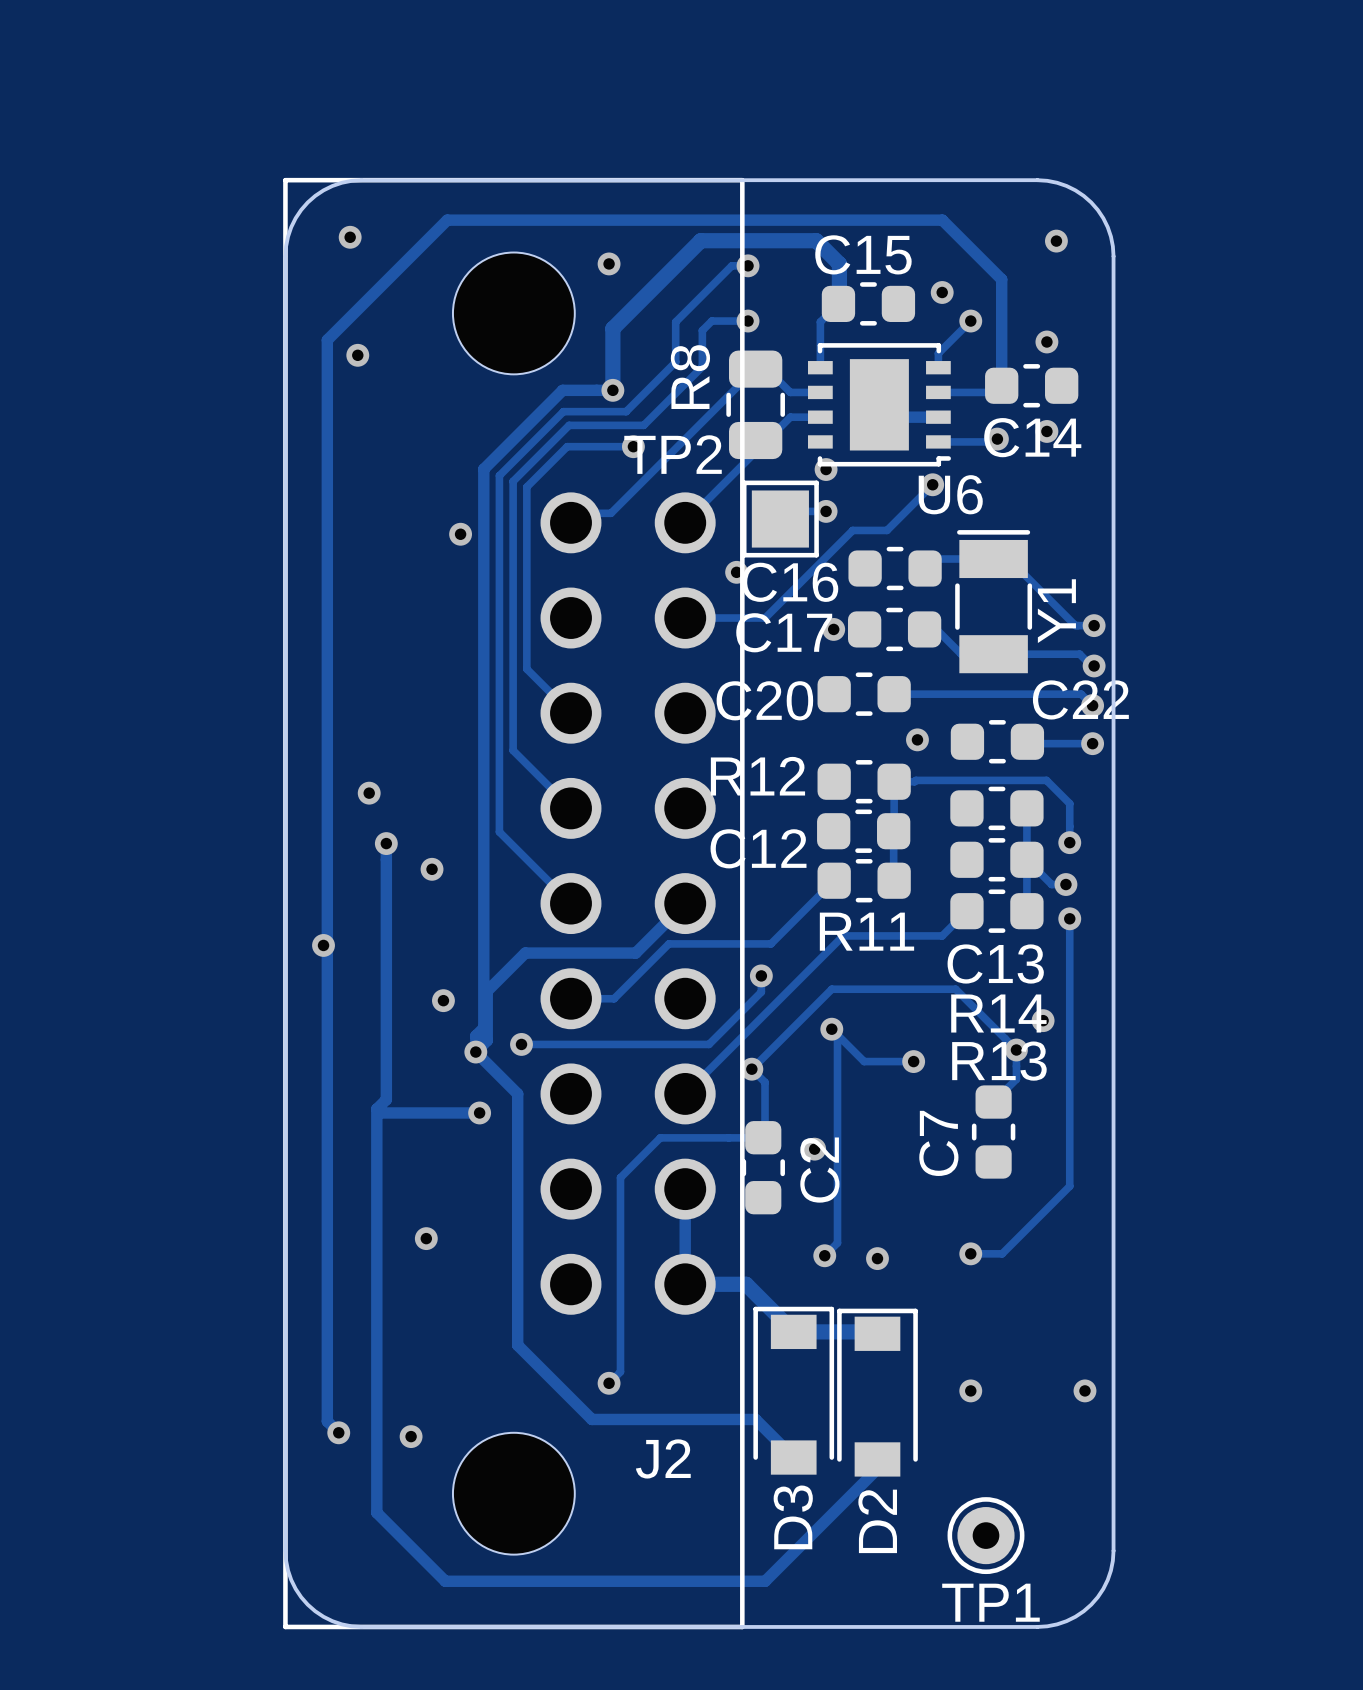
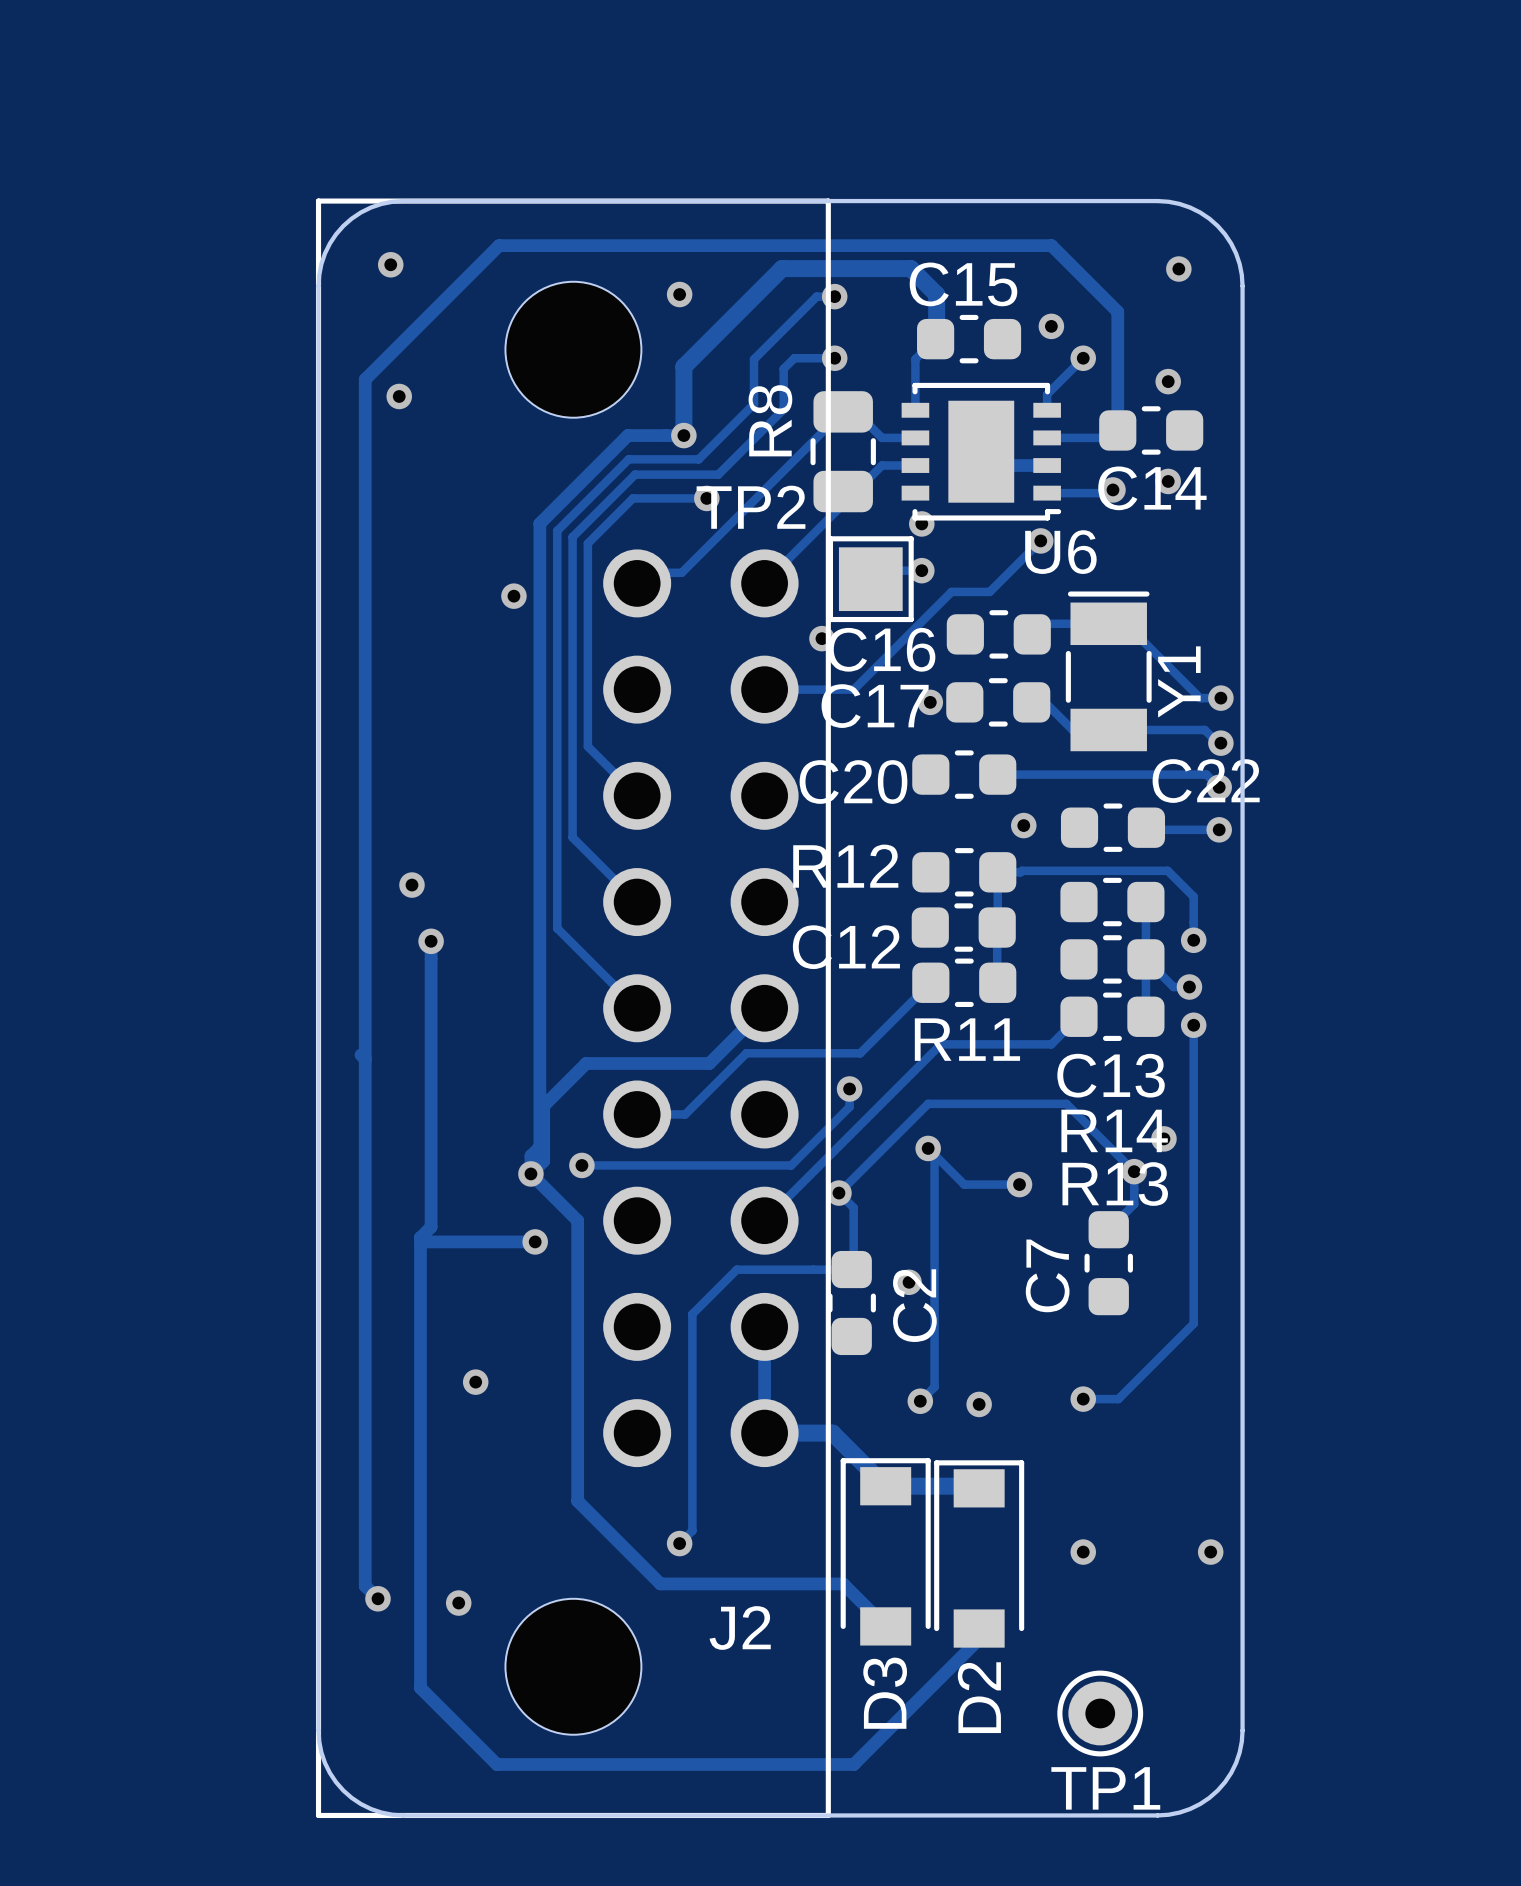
via: (432, 869) -> none
via: (323, 945) -> none
via: (443, 1000) -> none

